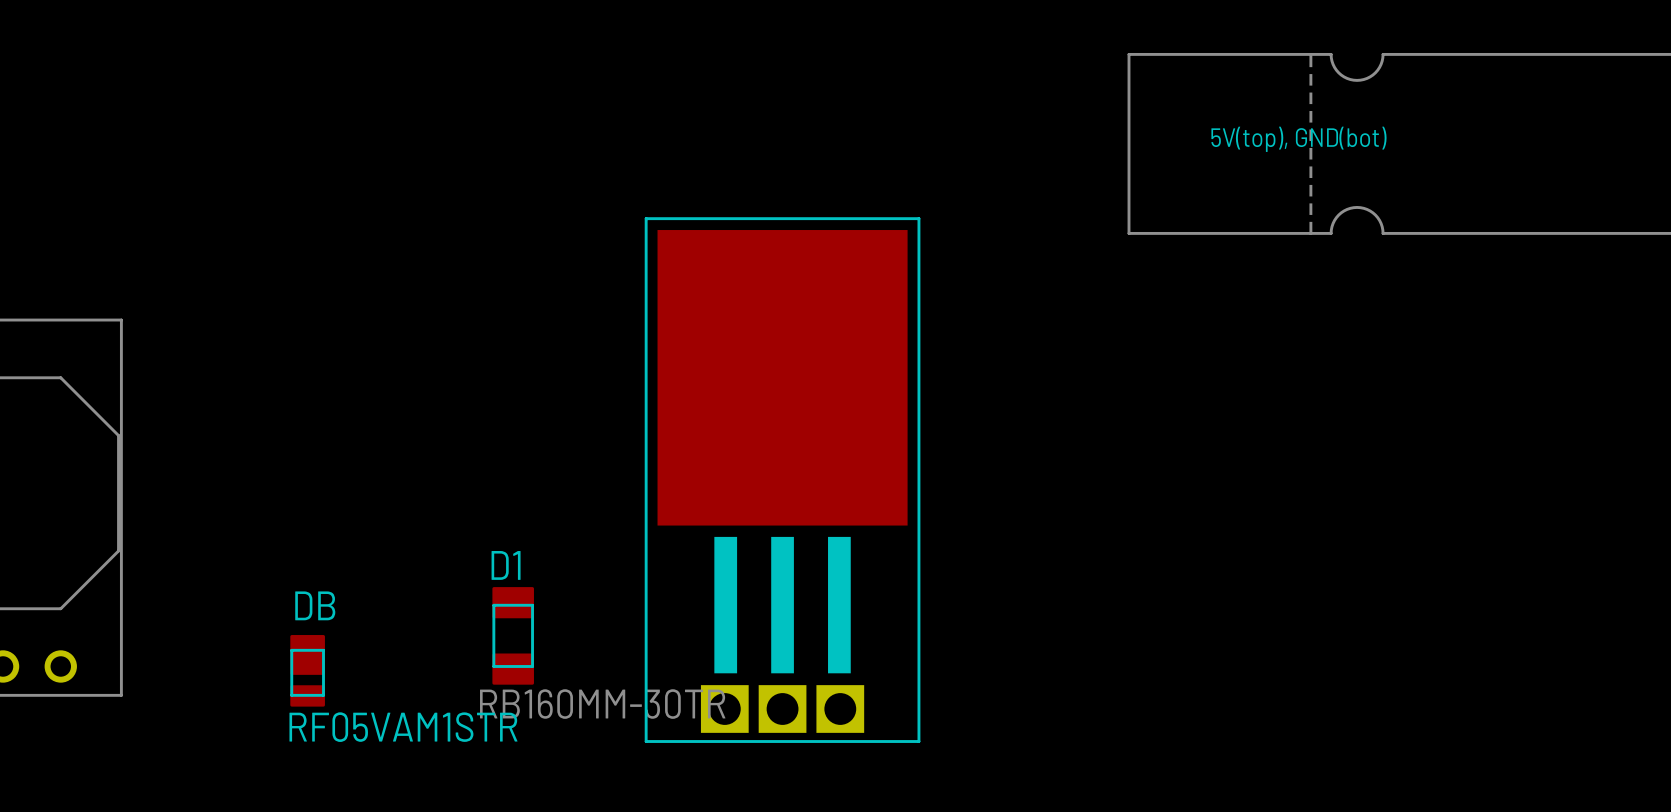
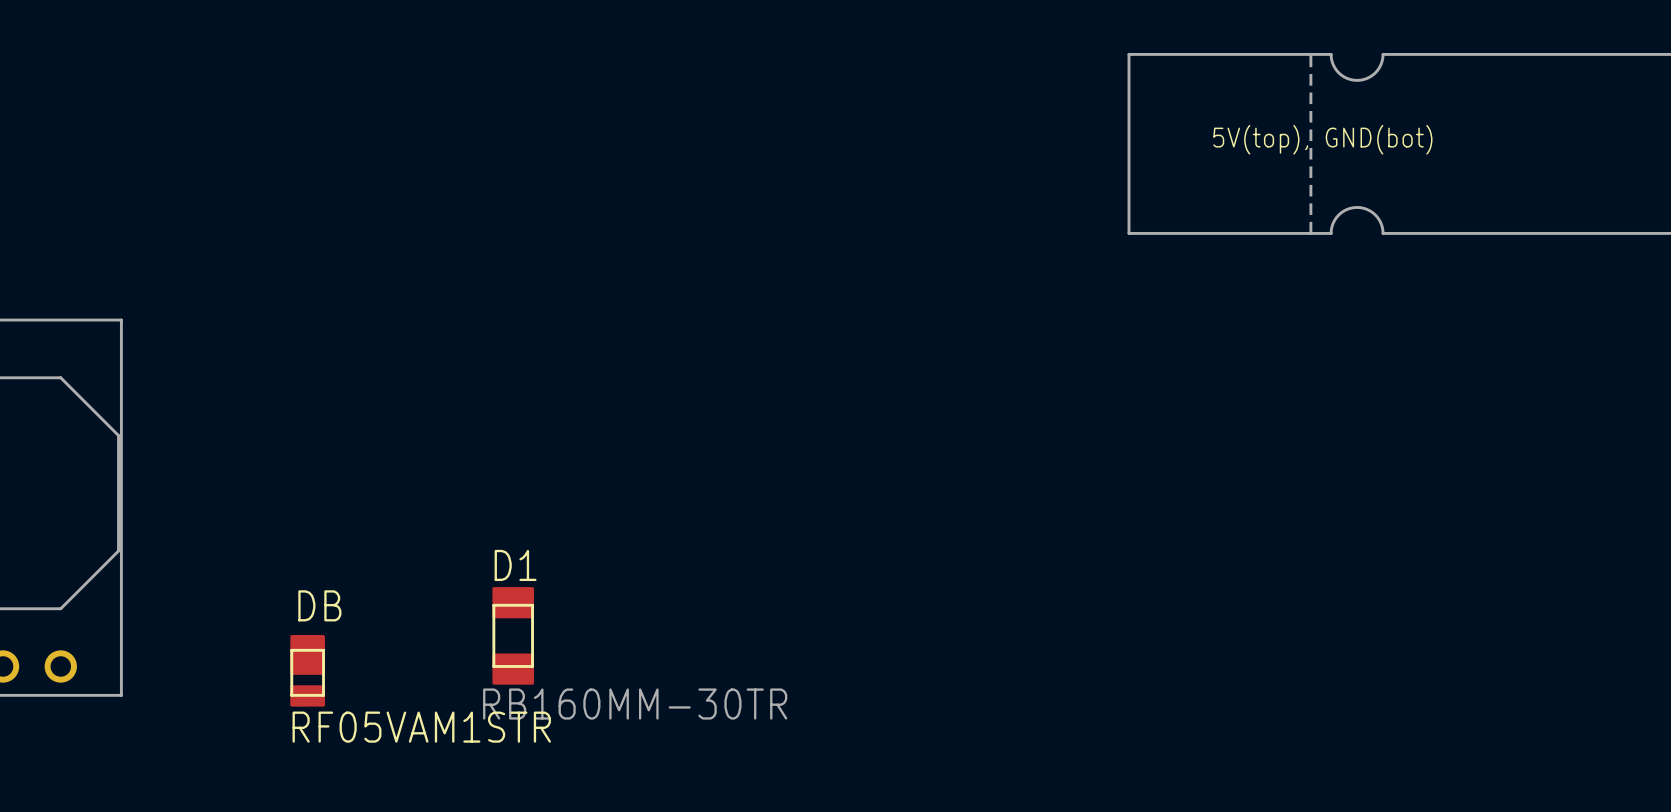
part: (782, 480) -> none

